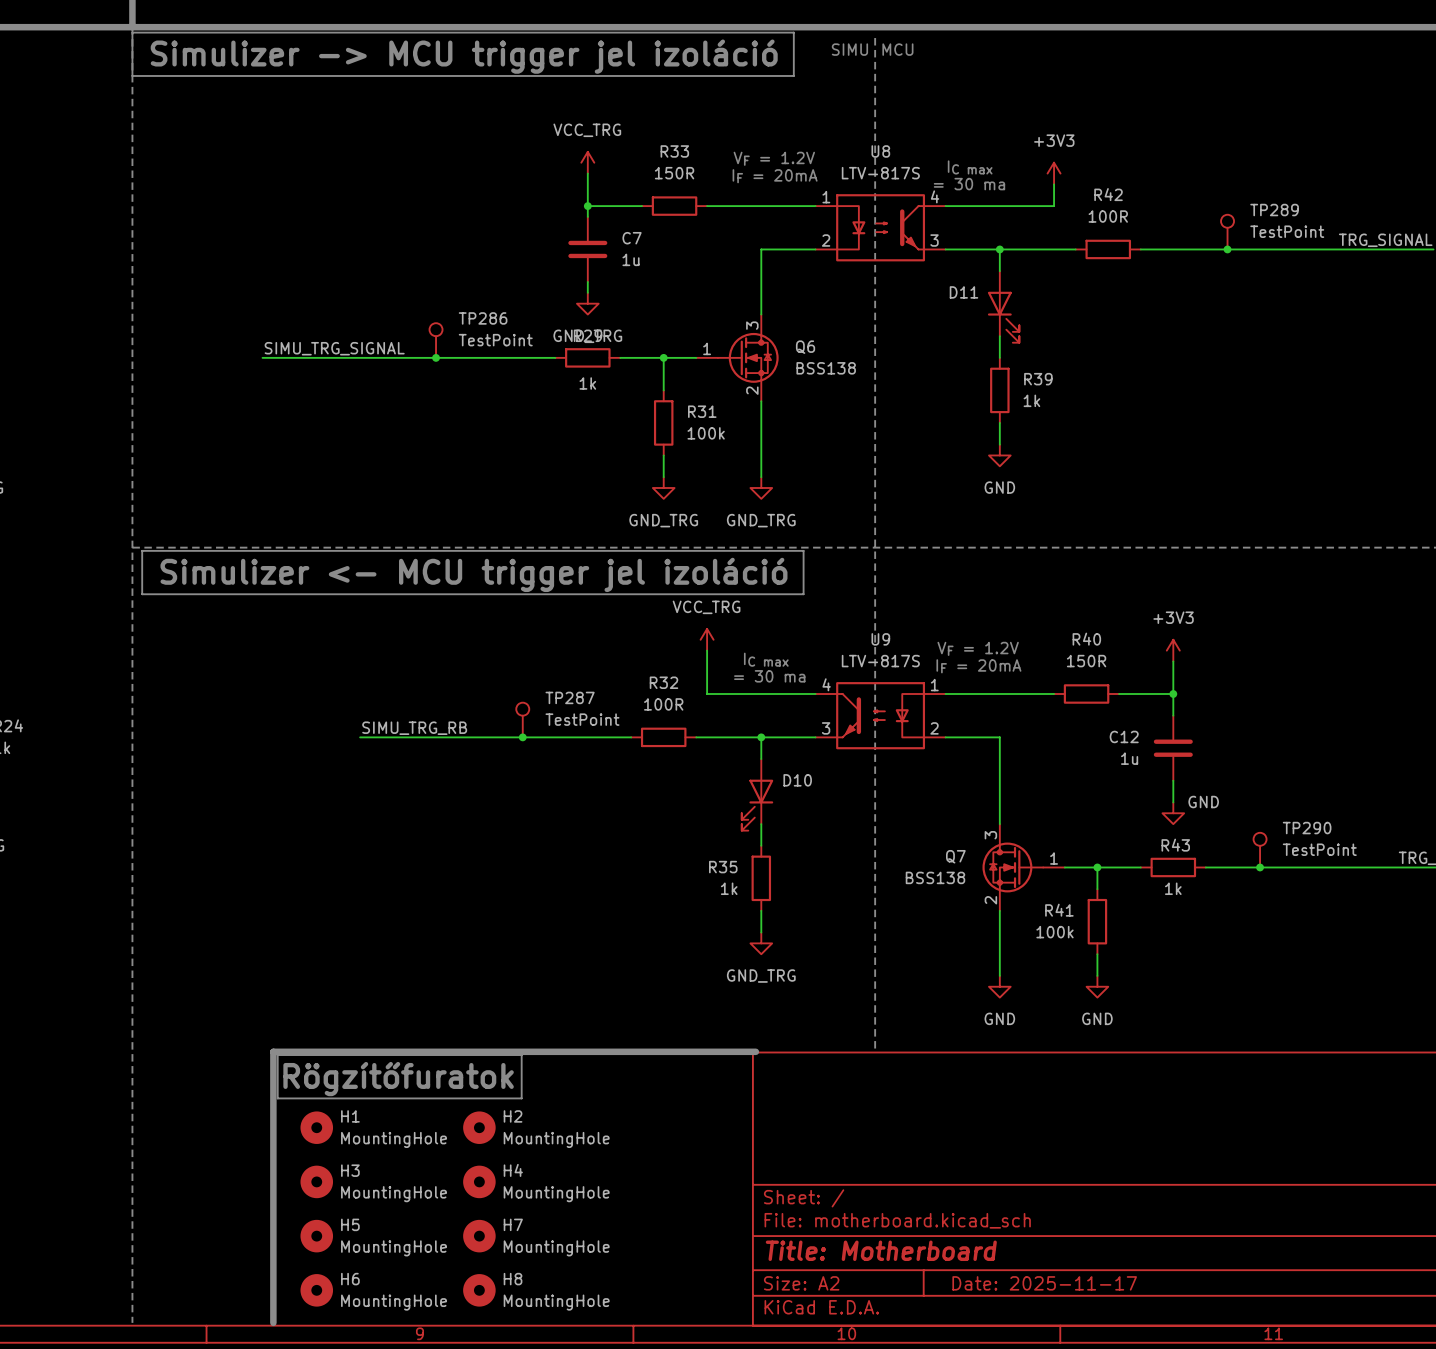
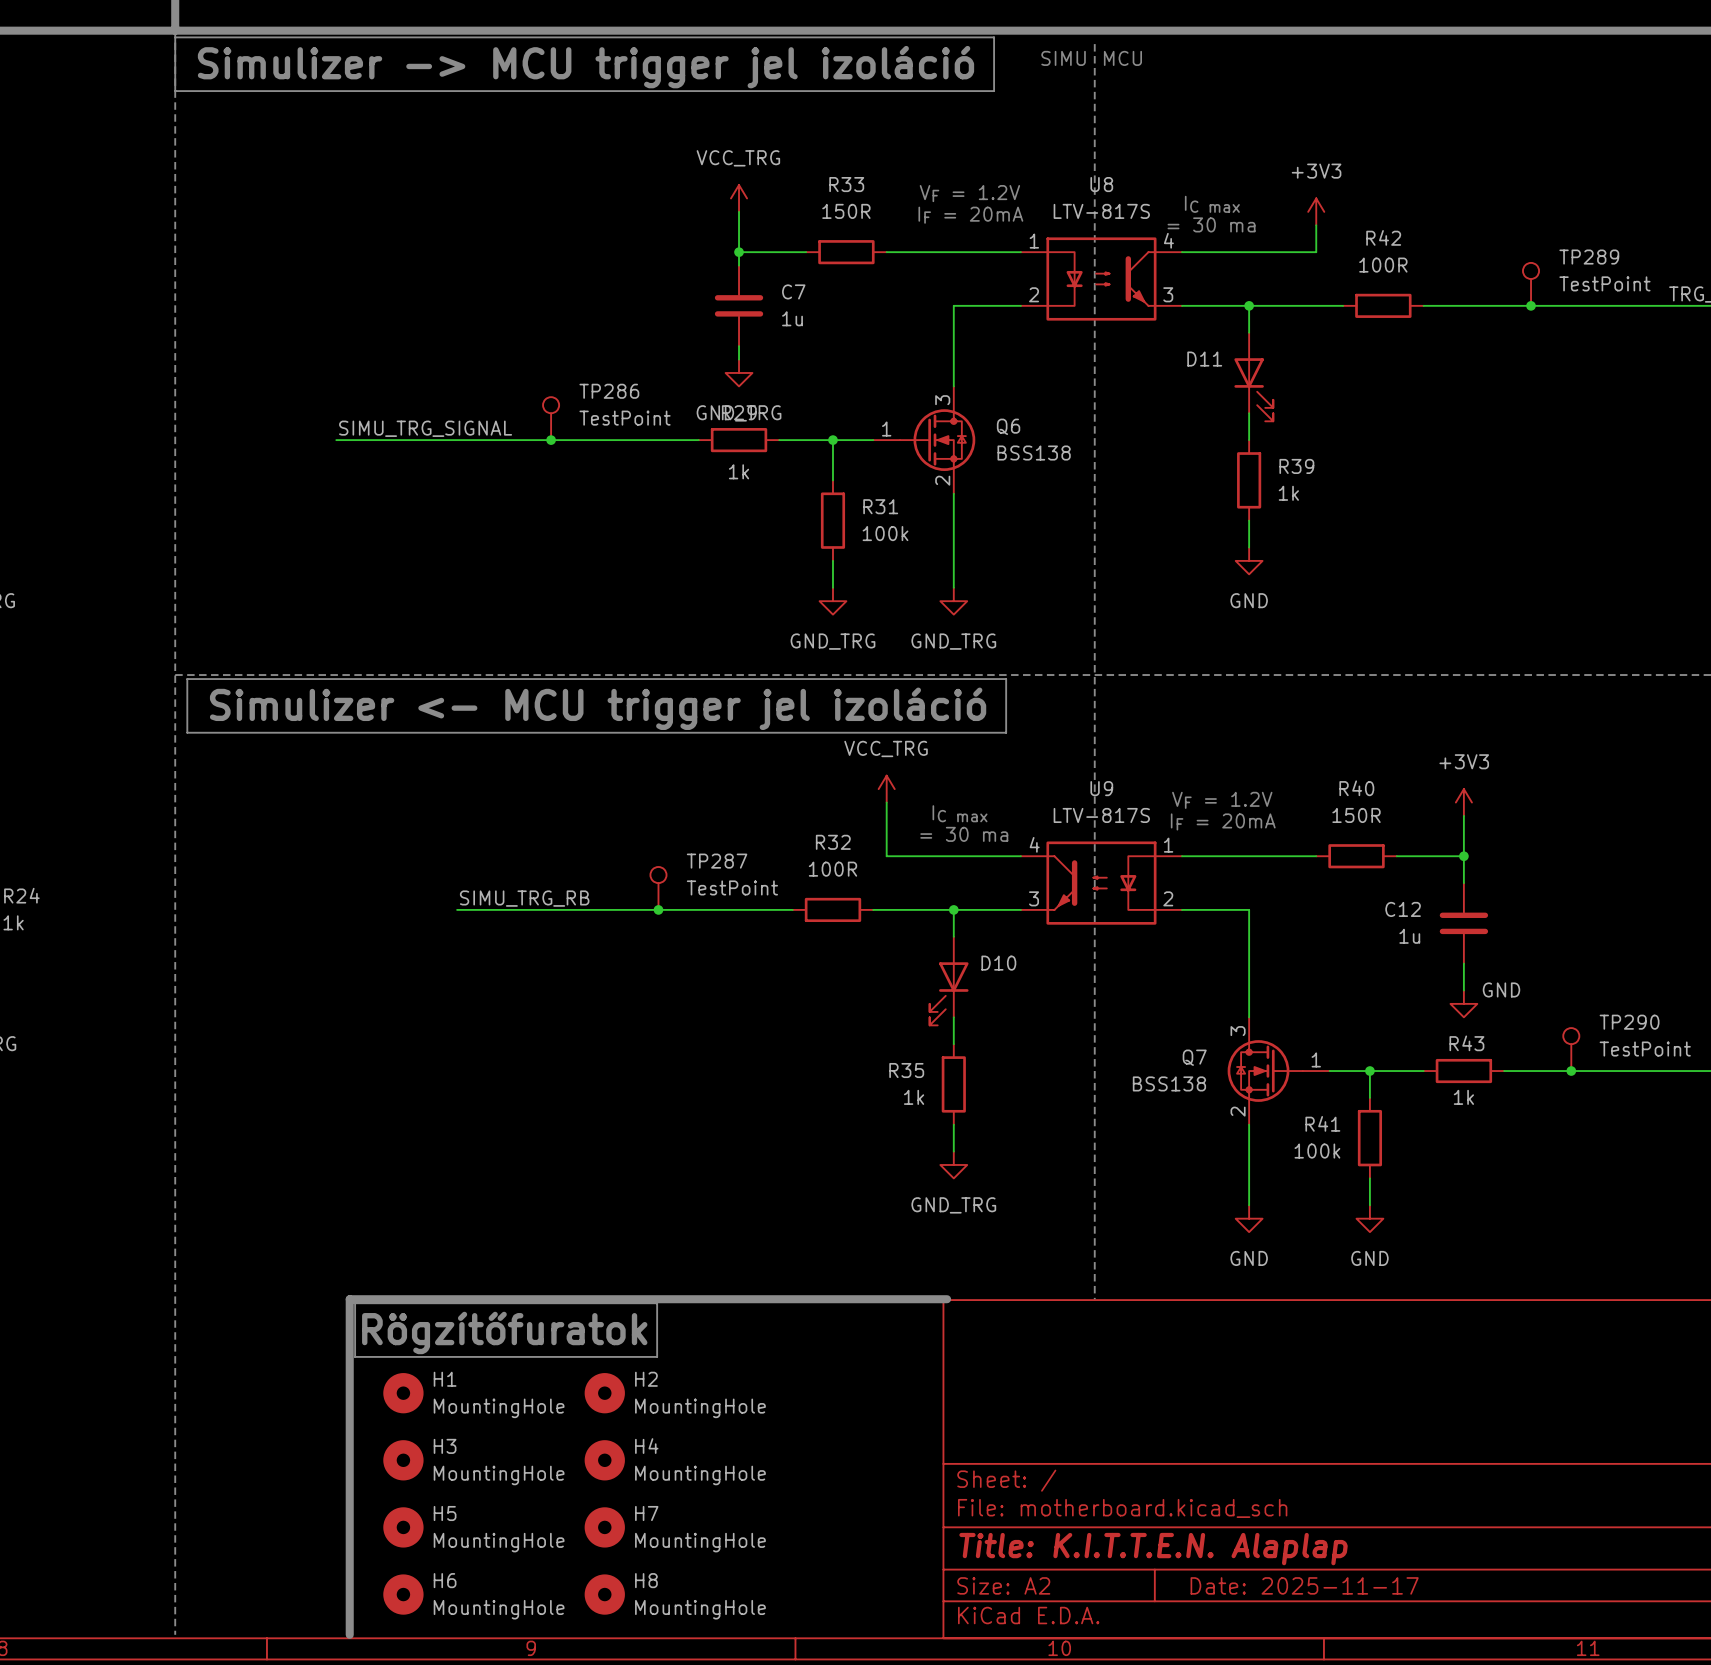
title block: Title: Motherboard (881, 1250) -> Title: K.I.T.T.E.N. Alaplap (1153, 1549)

